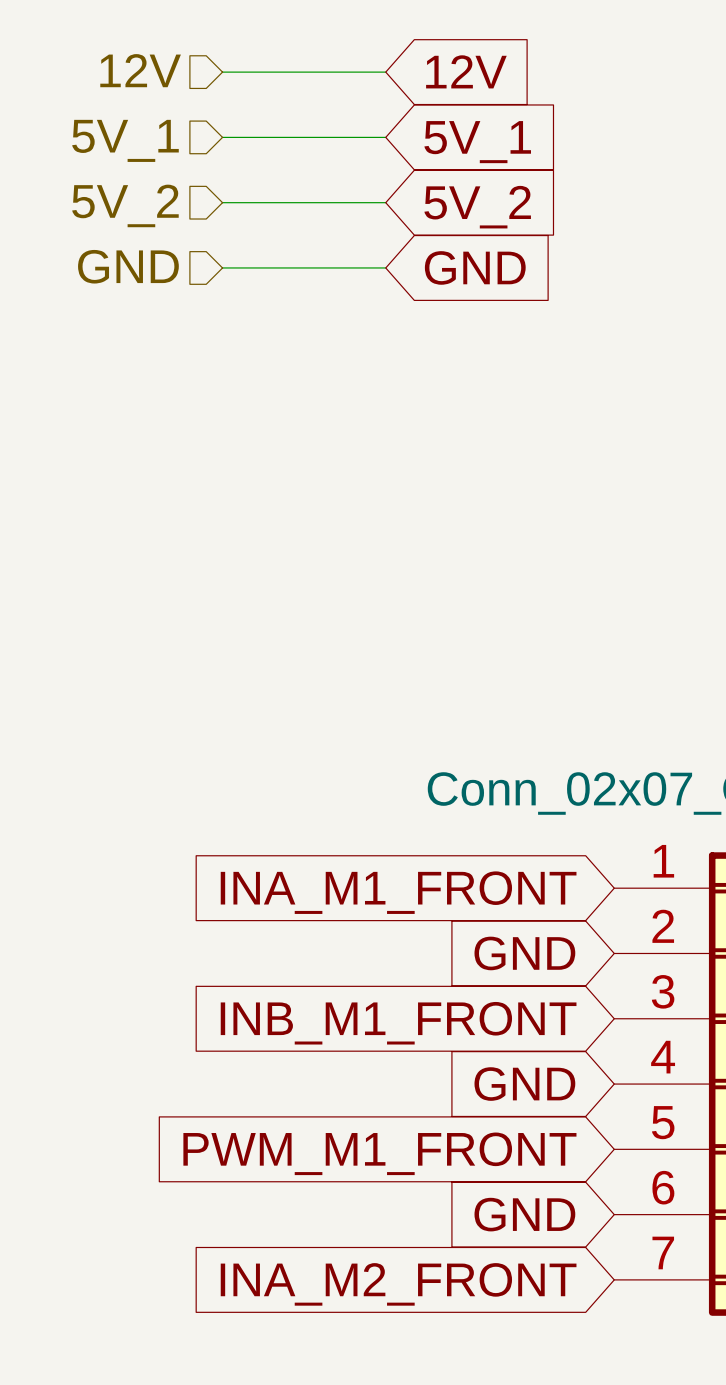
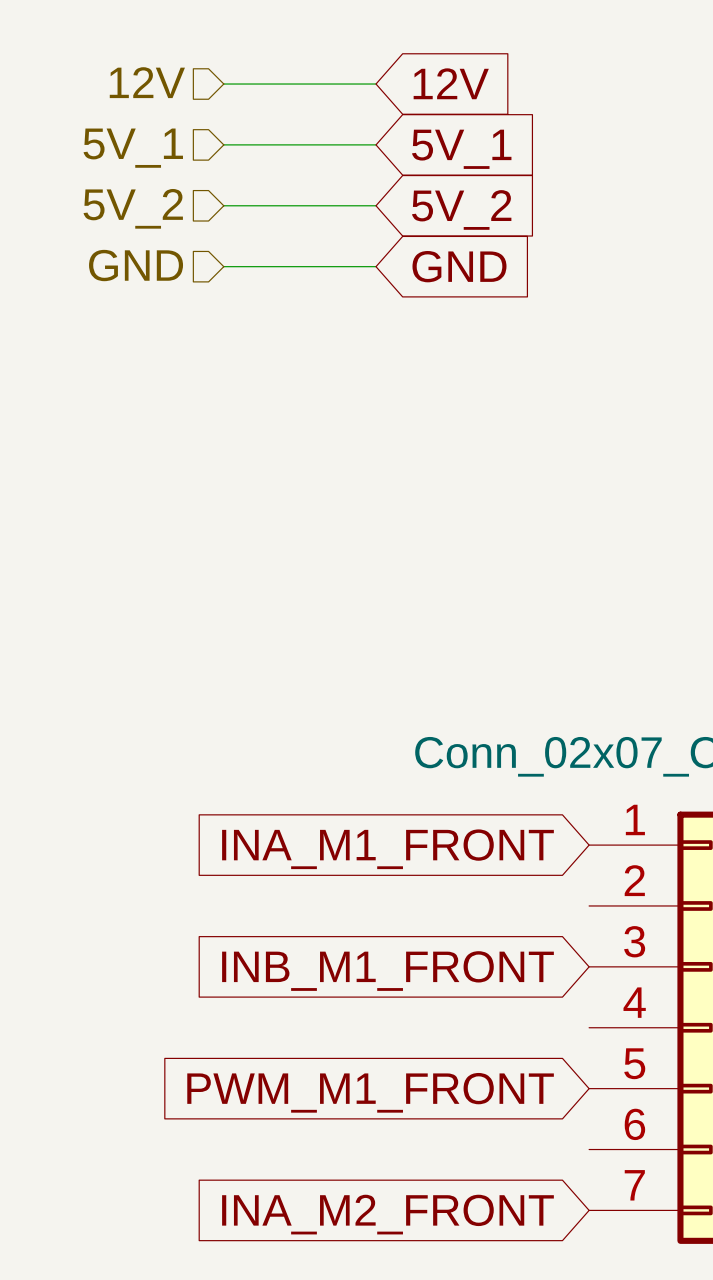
global label: GND (524, 953) -> none
global label: GND (524, 1084) -> none
global label: GND (524, 1214) -> none

